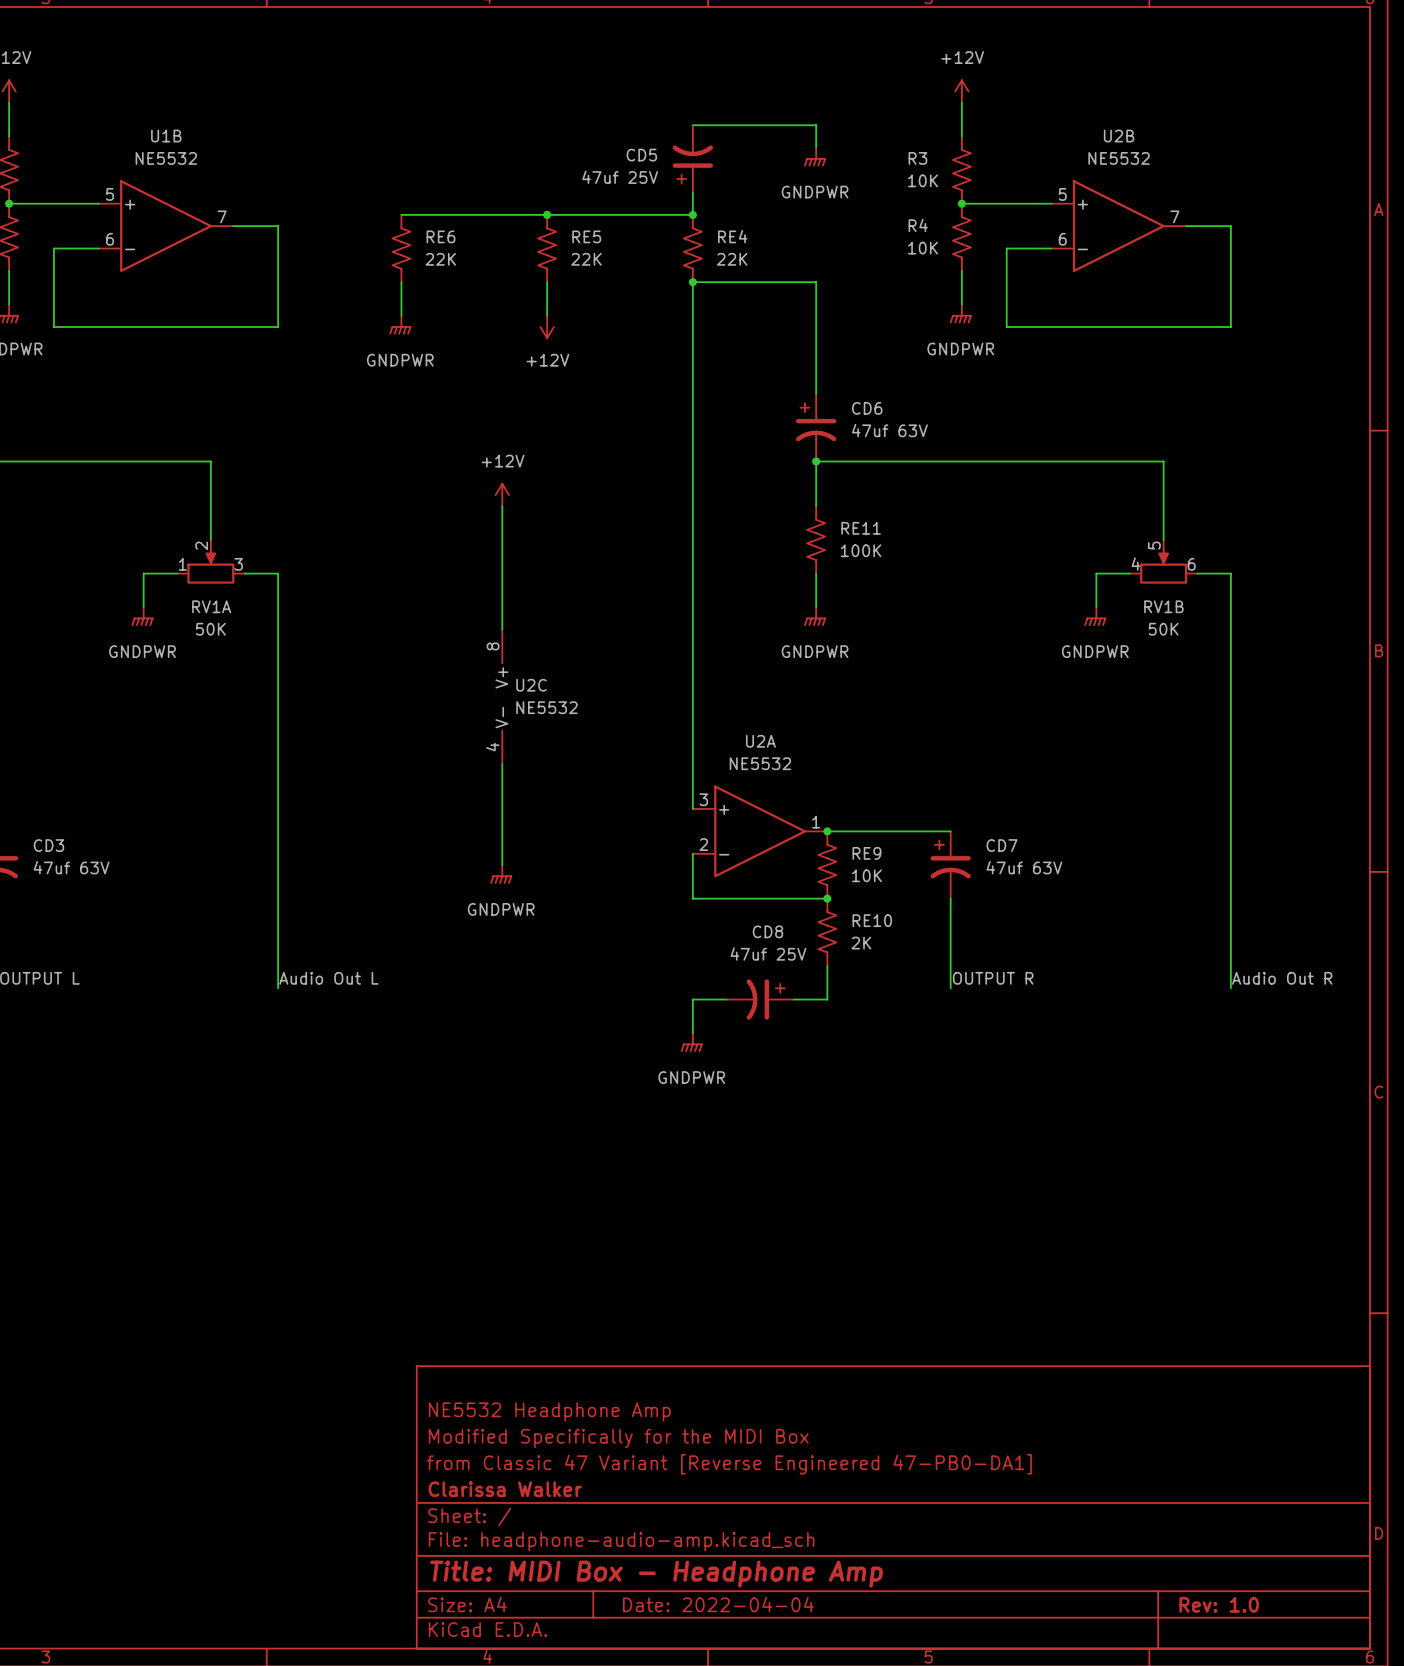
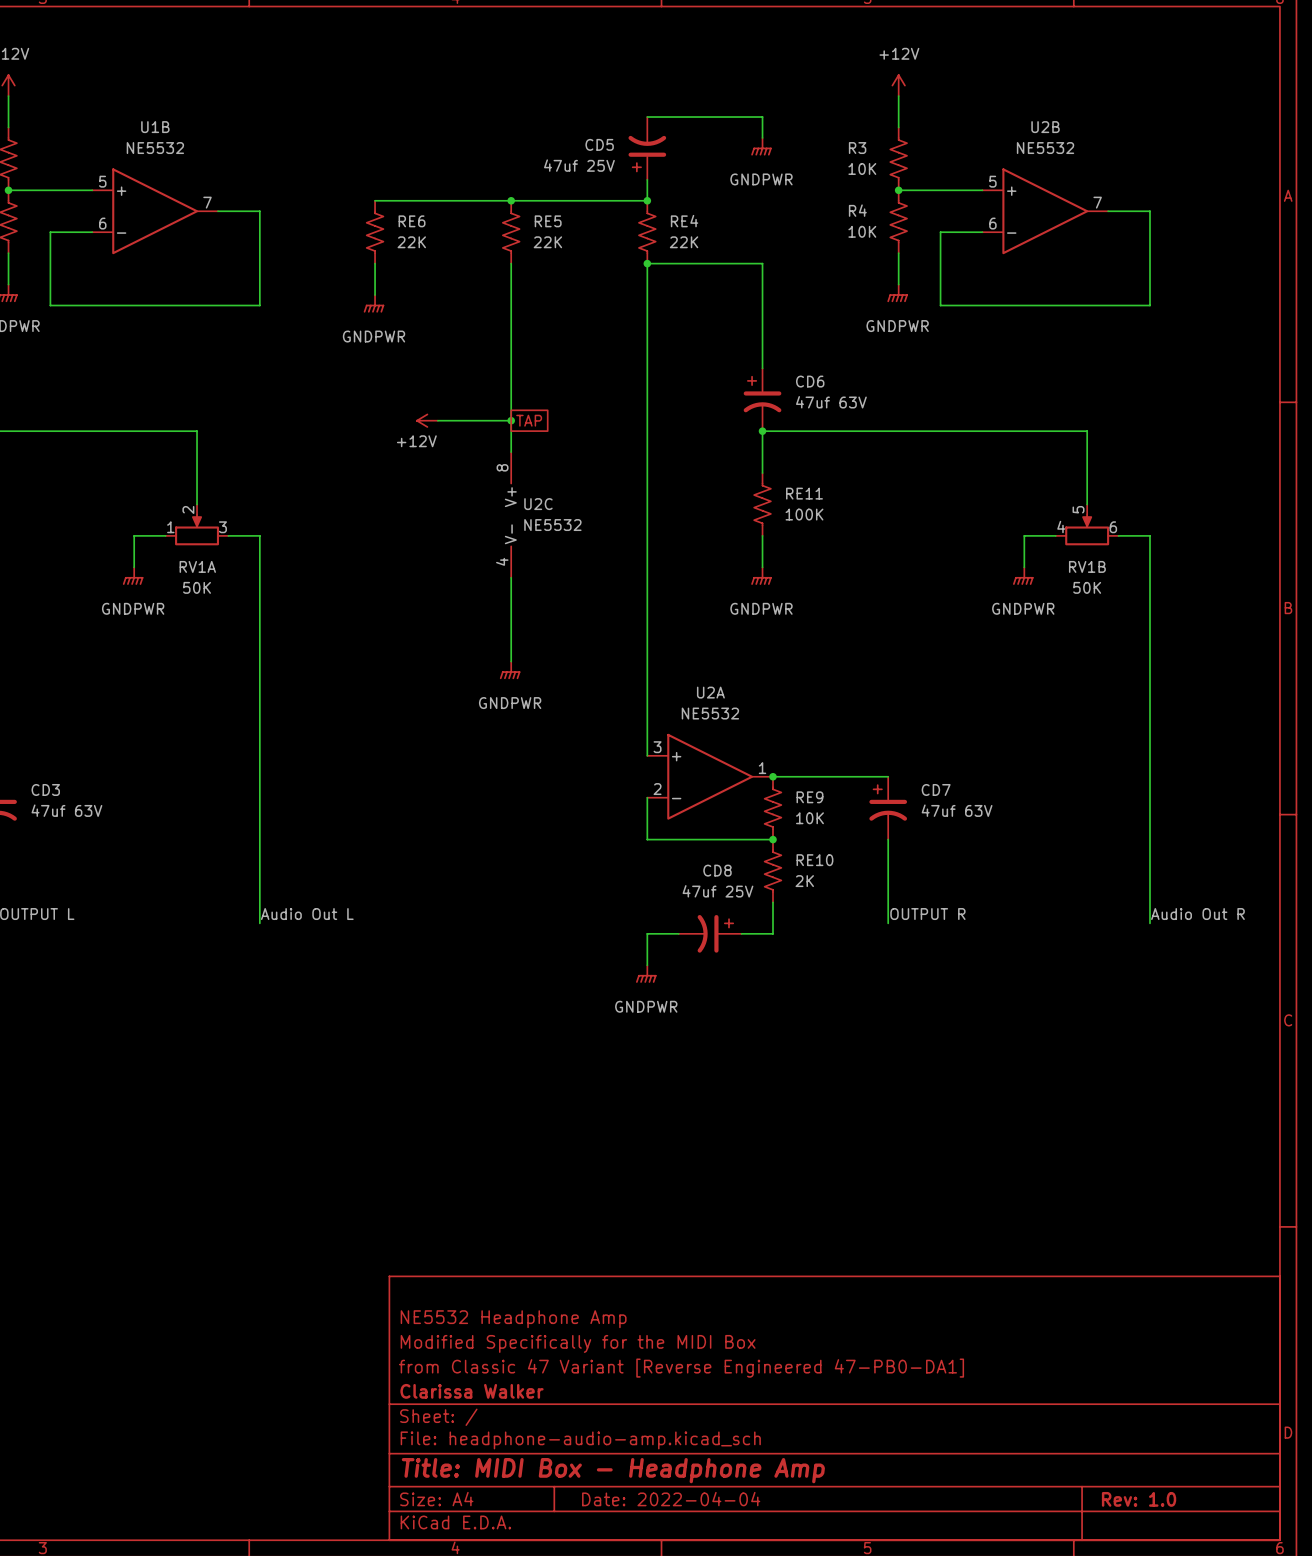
wire: none -> (511, 295) (511, 452)
power symbol: +12V (547, 327) -> none
wire: none -> (437, 420) (511, 420)
junction: none -> (511, 420)
global label: none -> TAP (529, 420)
power symbol text position: +12V (503, 461) -> +12V (416, 441)
power symbol rotation: 0° (502, 495) -> 90° counterclockwise (427, 420)
power symbol position: +12V (502, 495) -> +12V (427, 420)
wire: (502, 506) (502, 629) -> none
wire: none -> (511, 577) (511, 661)
U2C position: (502, 696) -> (511, 514)
wire: (502, 764) (502, 865) -> none
power symbol position: GNDPWR (501, 874) -> GNDPWR (510, 670)

